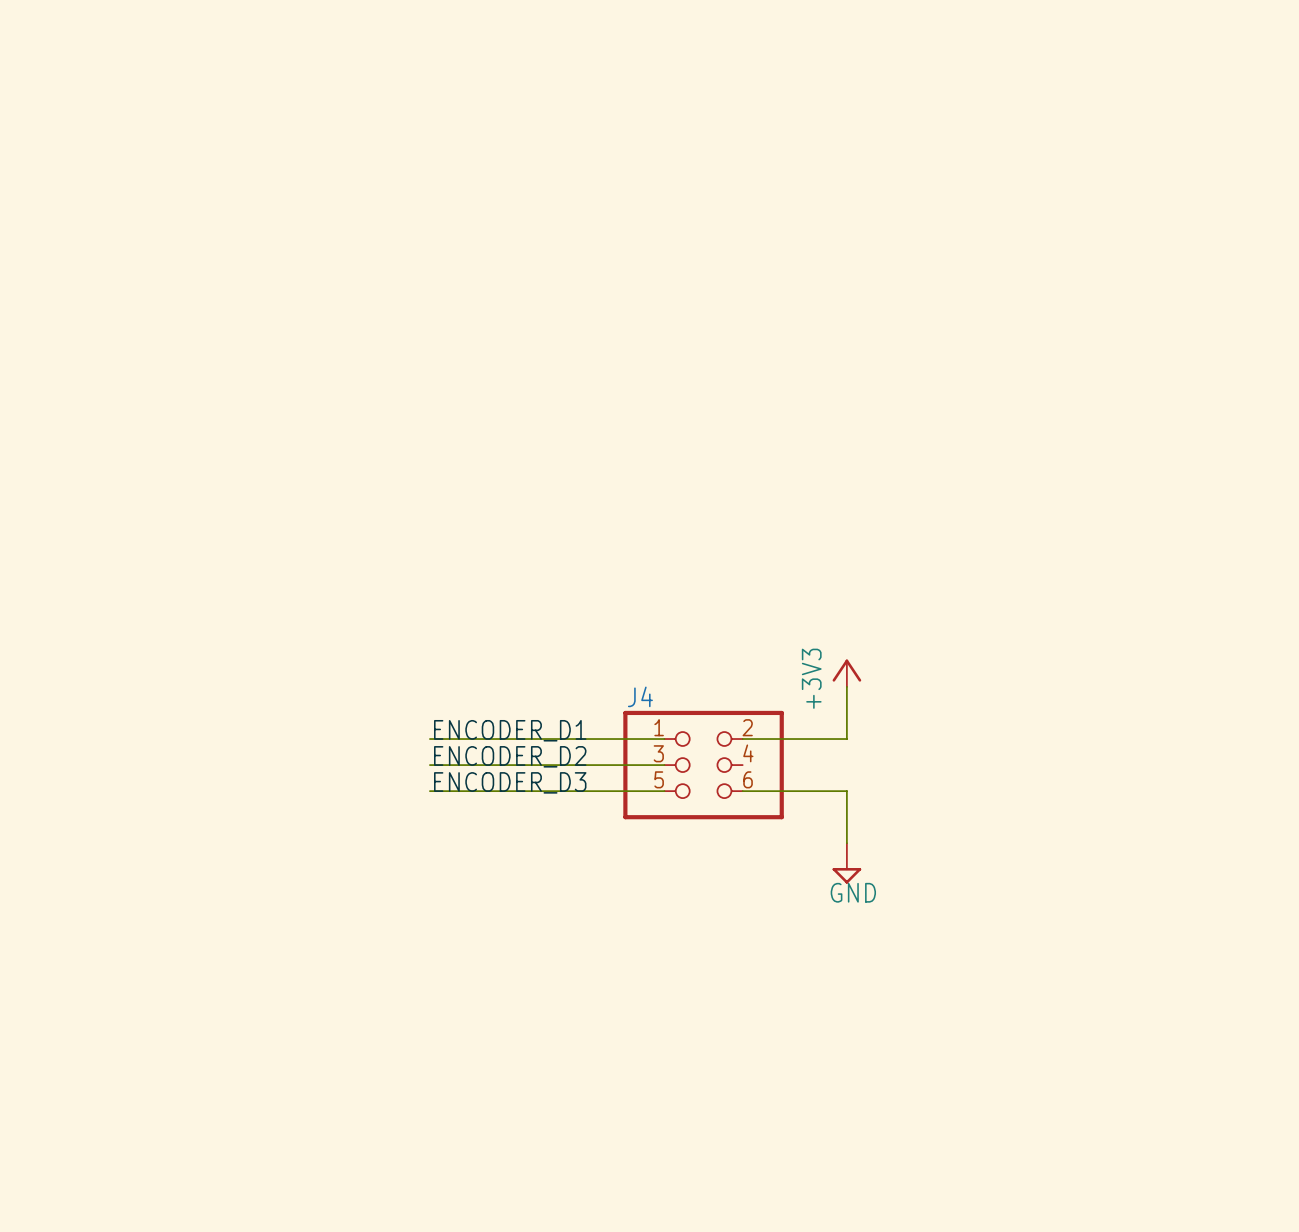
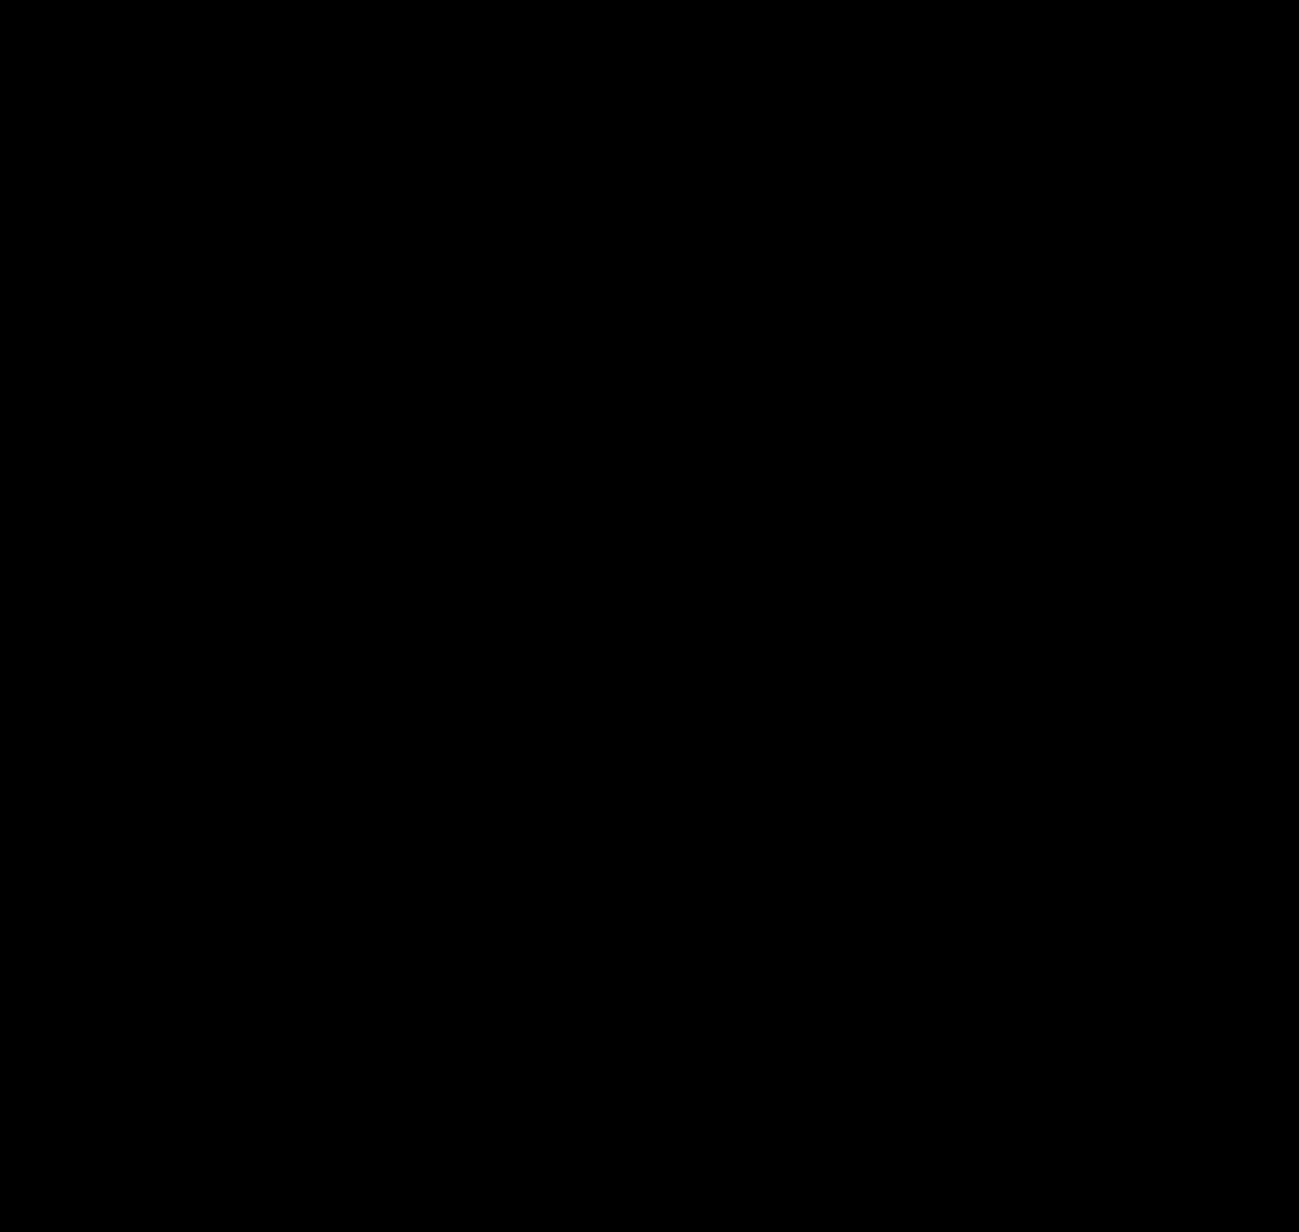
power symbol: +3V3 (846, 673) -> none
wire: (846, 686) (846, 739) (742, 739) -> none
label: ENCODER_D1 (510, 730) -> none
wire: (429, 739) (664, 739) -> none
label: ENCODER_D2 (510, 756) -> none
wire: (429, 765) (664, 765) -> none
J4: (703, 765) -> none
label: ENCODER_D3 (510, 782) -> none
wire: (429, 791) (664, 791) -> none
wire: (742, 791) (846, 791) (846, 843) -> none
power symbol: GND (846, 863) -> none

